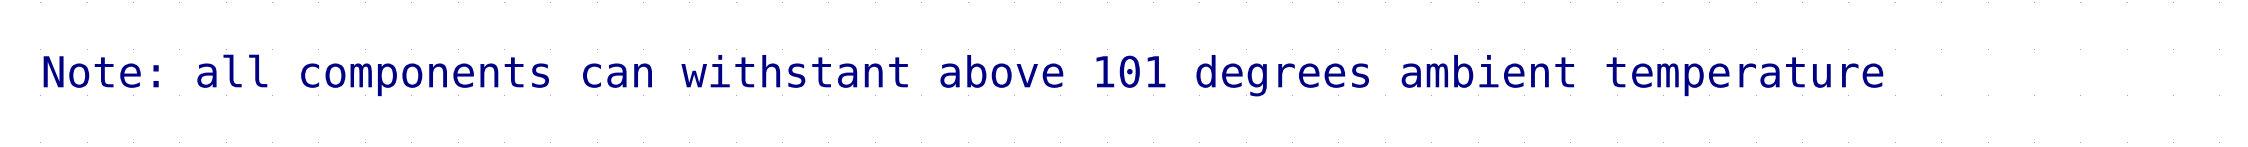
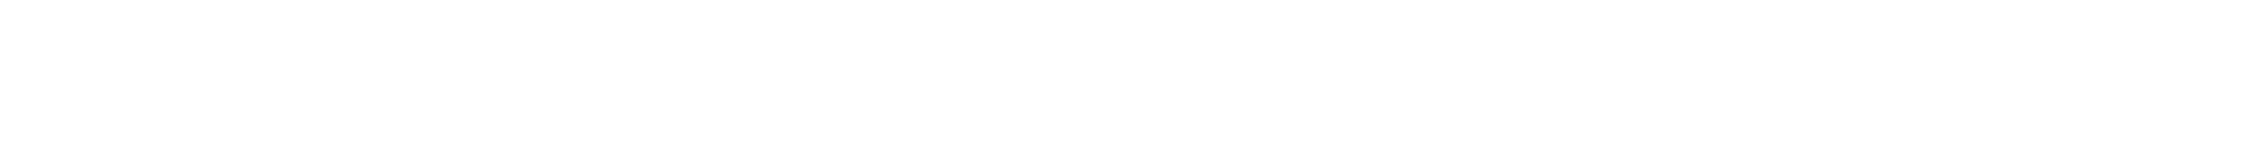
text: Note: all components can withstant above 101 degrees ambient temperature (963, 75) -> none

